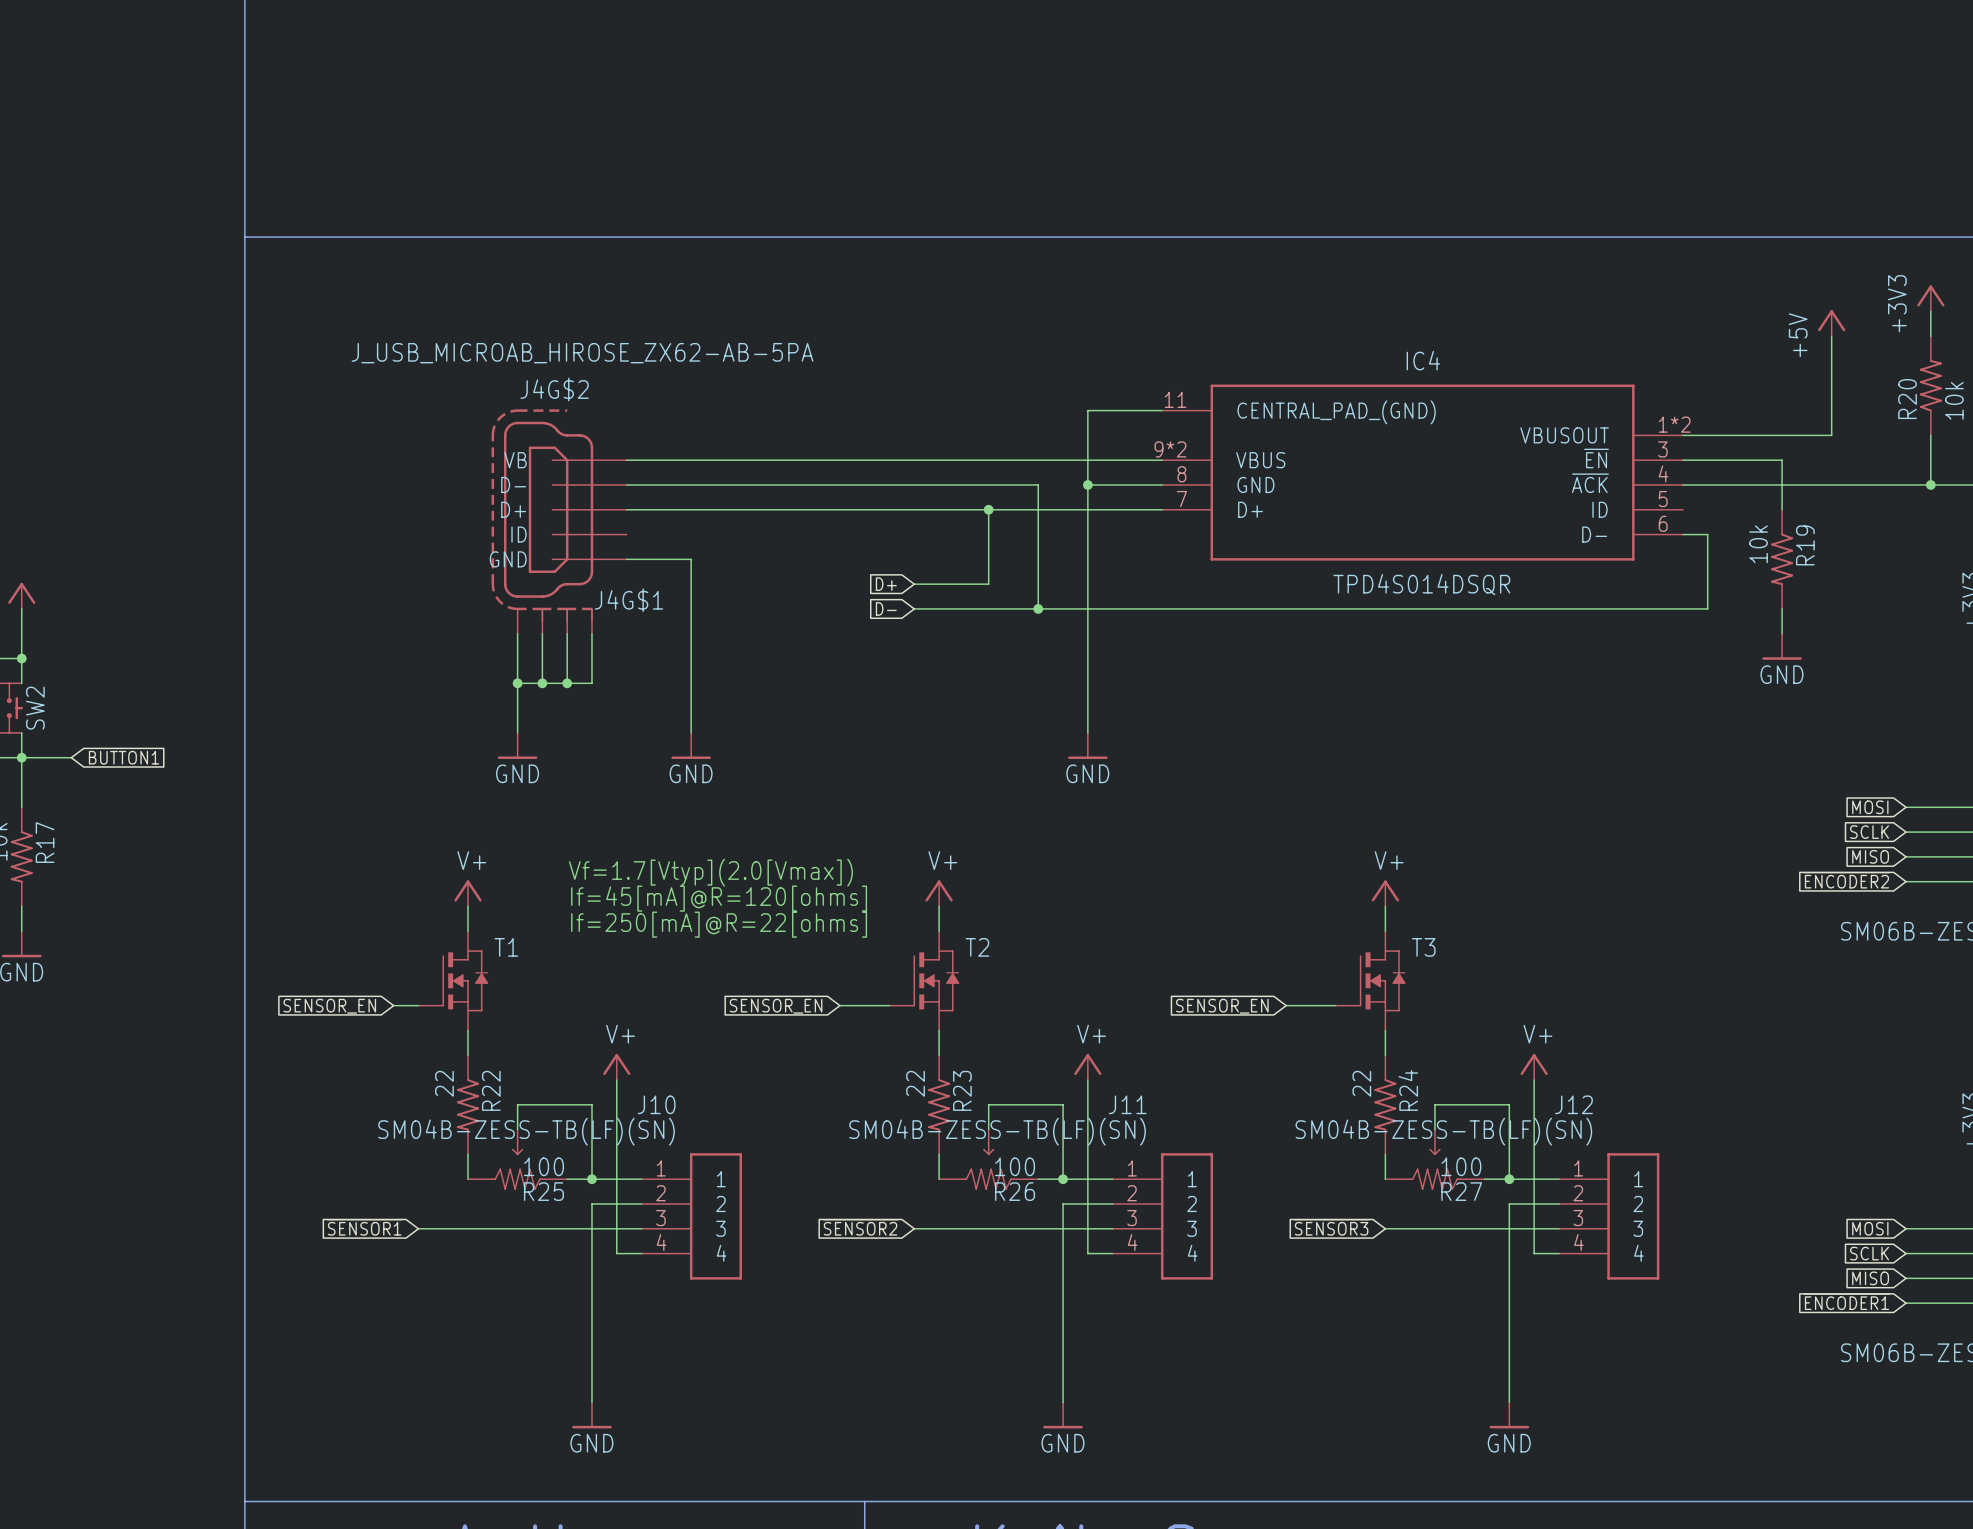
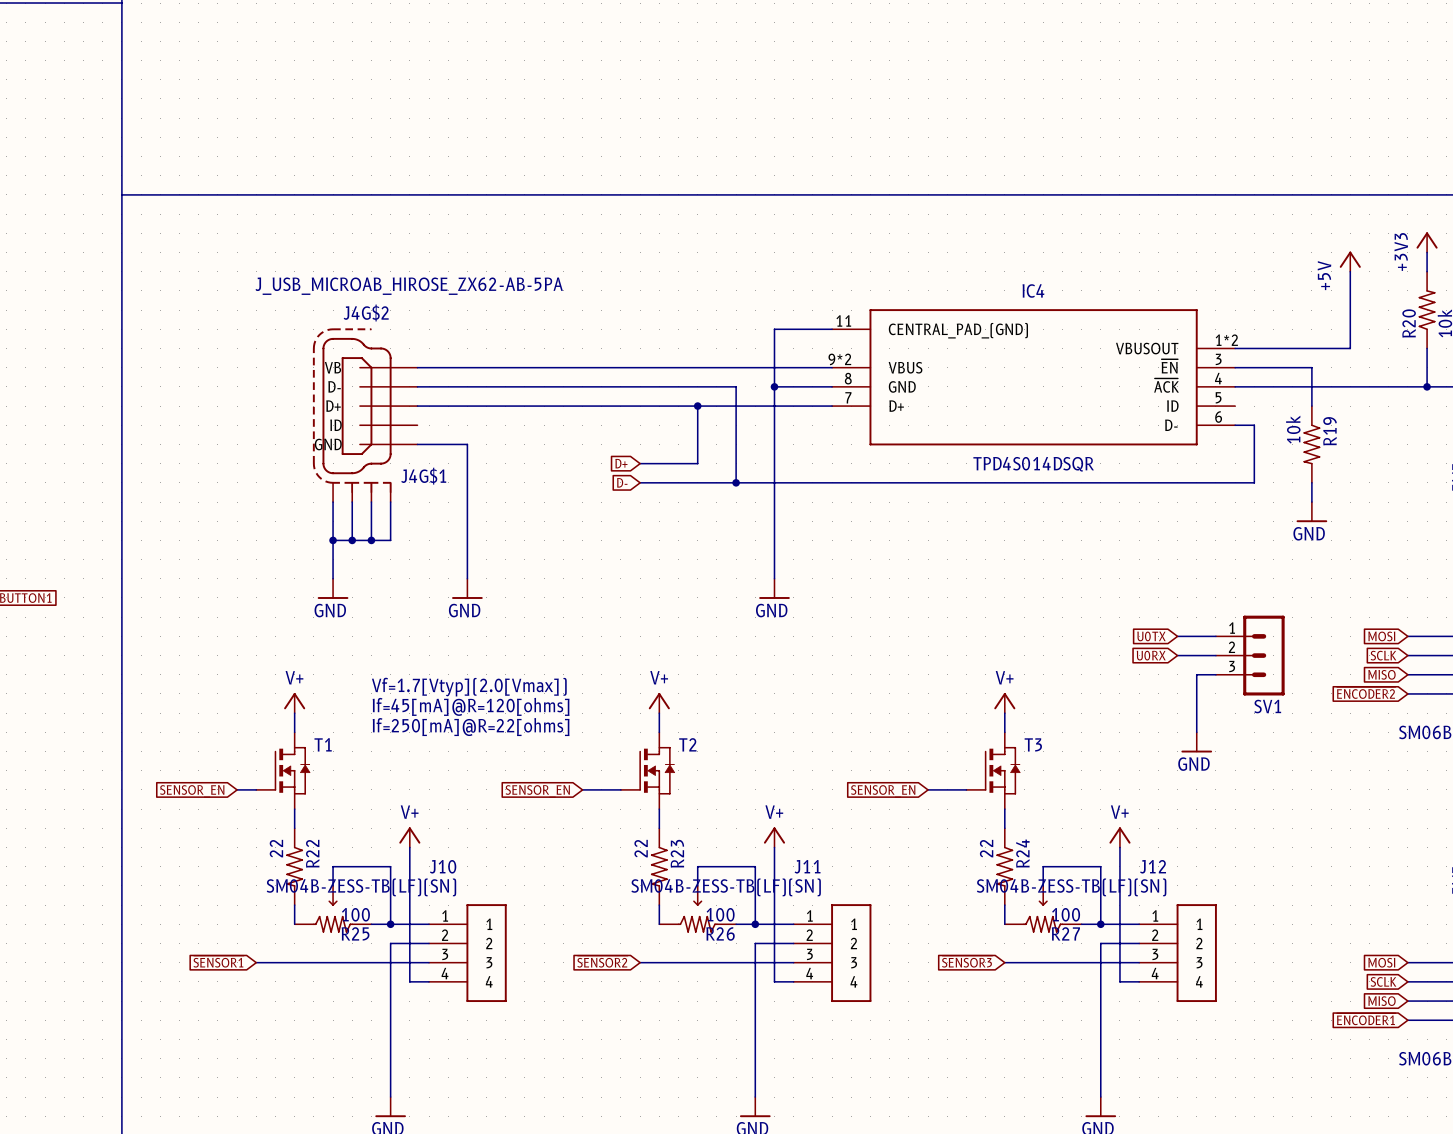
global label: none -> U0TX (1151, 636)
wire: none -> (1177, 636) (1215, 636)
global label: none -> U0RX (1151, 655)
wire: none -> (1177, 655) (1215, 655)
SV1: none -> (1250, 655)
wire: none -> (1215, 674) (1196, 674) (1196, 732)
power symbol: none -> GND (1196, 742)

